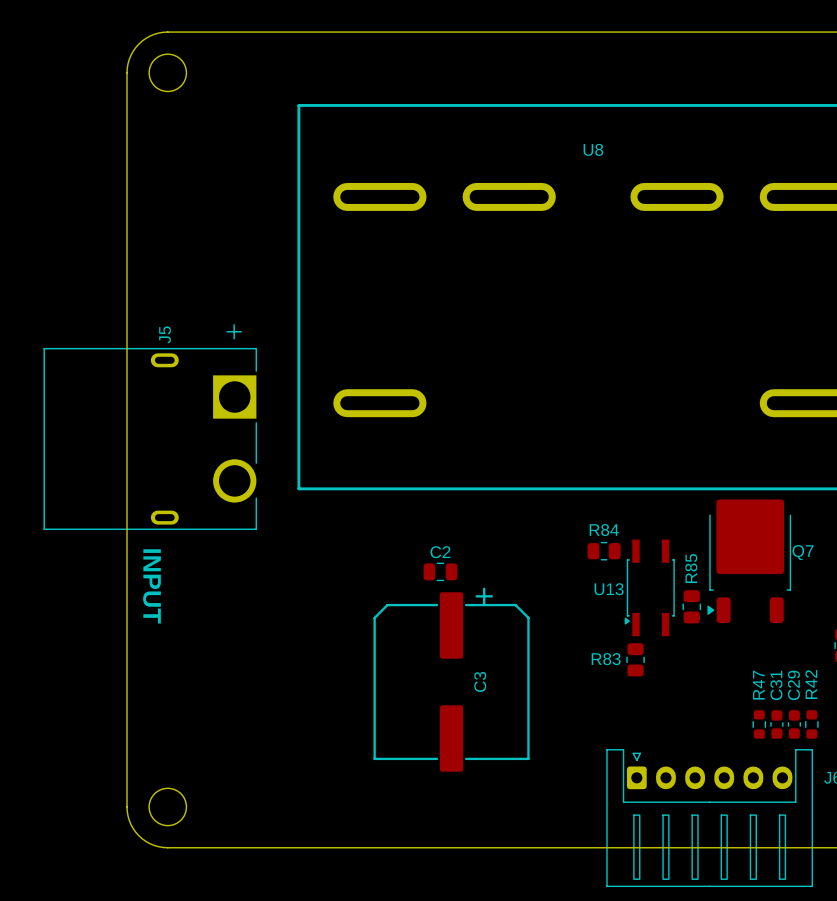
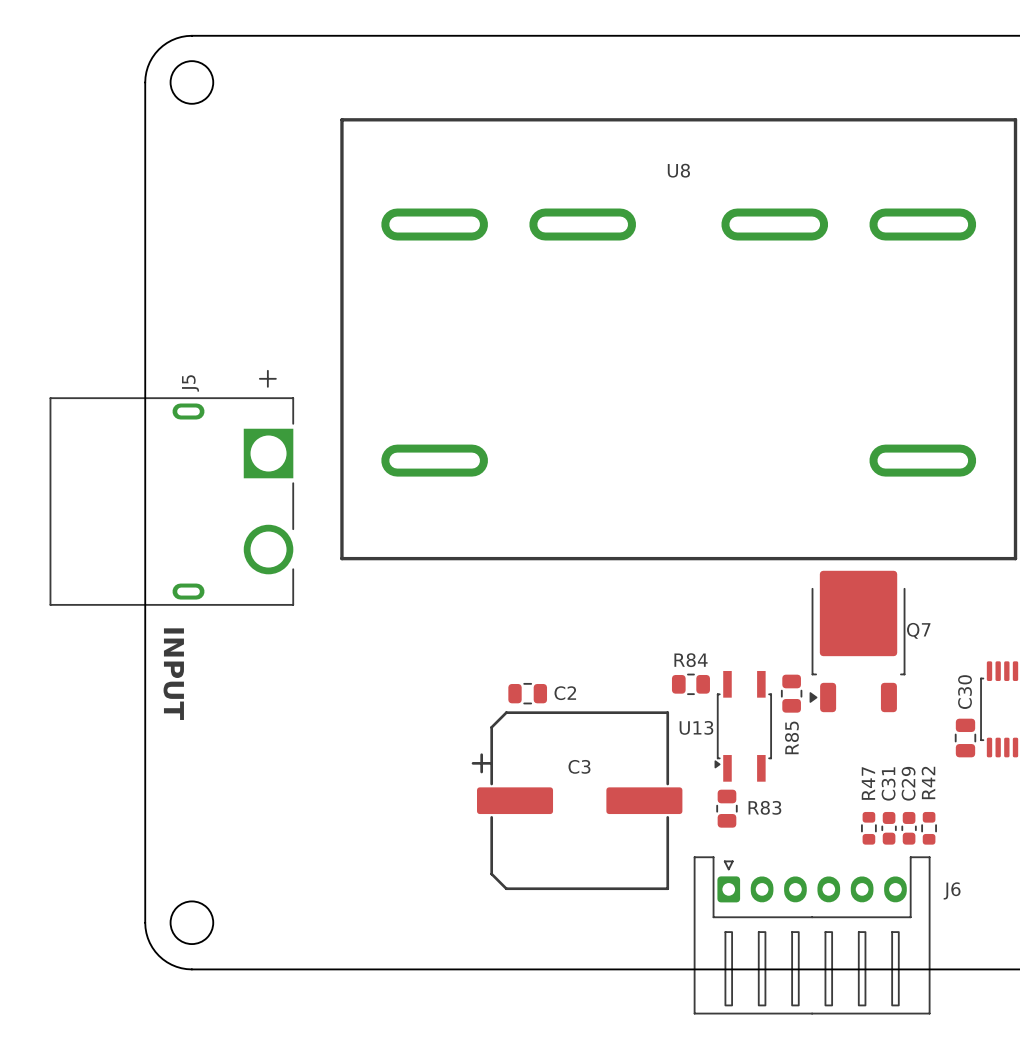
R84 position: (604, 551) -> (690, 684)
C2 name position: C2 (440, 552) -> C2 (565, 693)
R85 name position: R85 (691, 568) -> R85 (791, 737)
C2 position: (440, 571) -> (527, 693)
U13 position: (649, 587) -> (743, 726)
R83 name position: R83 (606, 659) -> R83 (764, 807)
R83 position: (635, 659) -> (726, 808)
C3 rotation: 0° (451, 679) -> 90° counterclockwise (577, 800)

